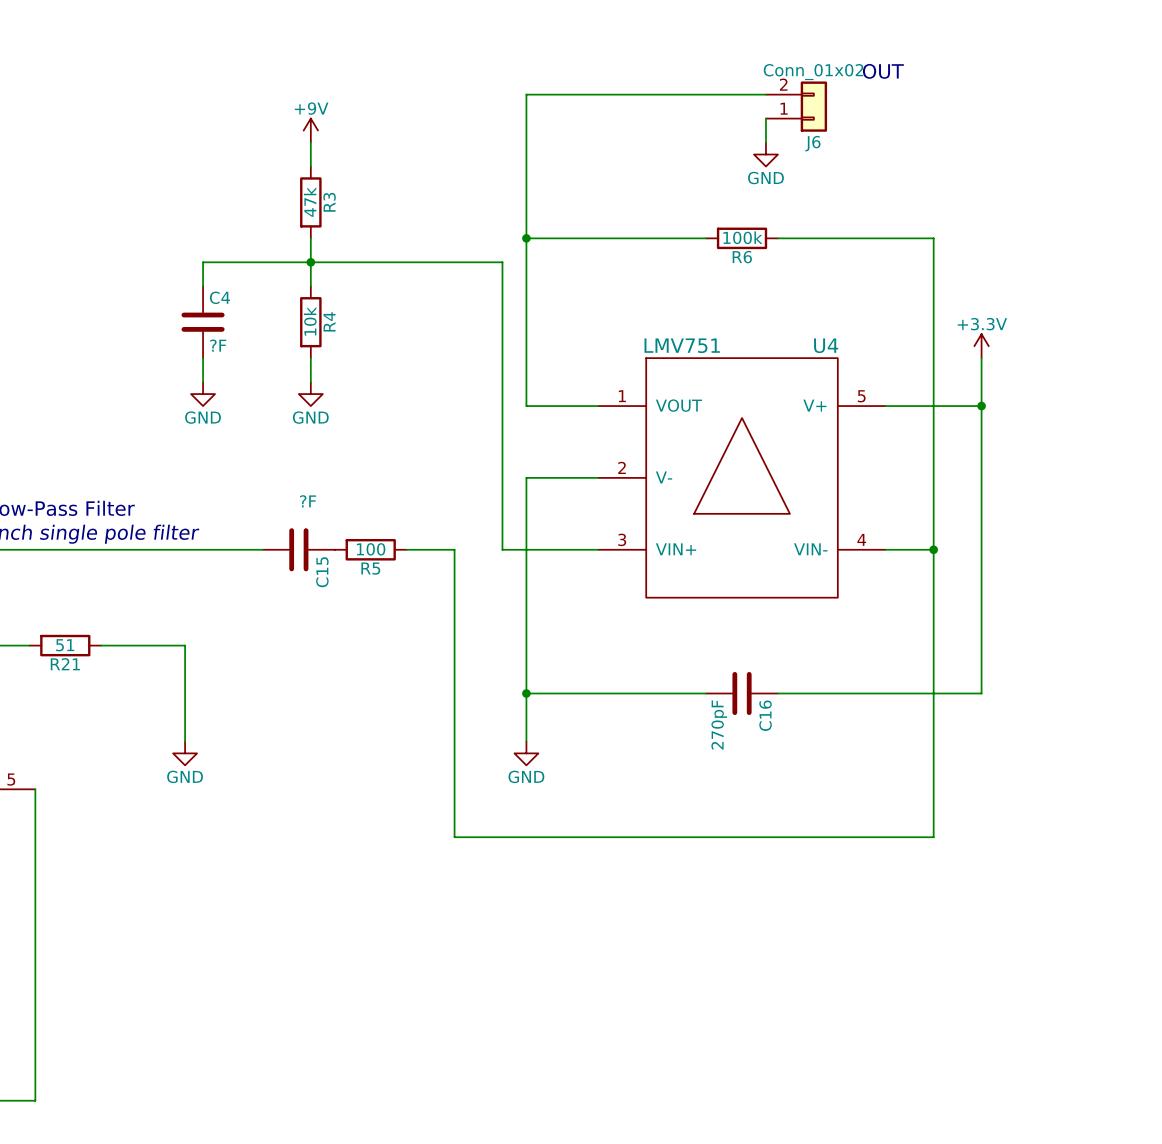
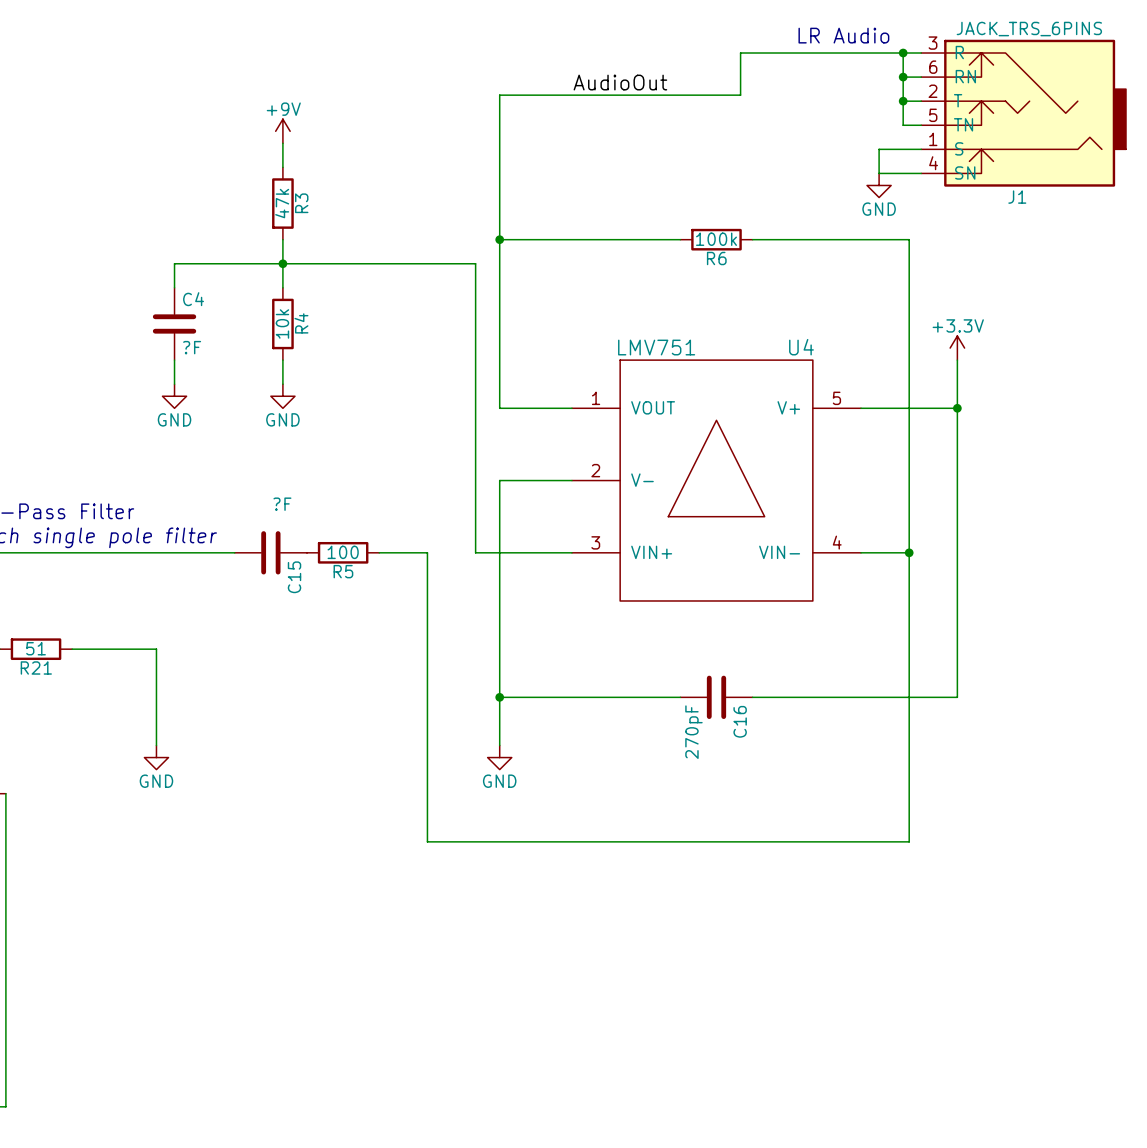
text: none -> LR Audio (843, 35)
wire: none -> (903, 53) (903, 125) (921, 125)
junction: none -> (903, 53)
wire: none -> (921, 53) (740, 53) (740, 95)
text: OUT (883, 71) -> none
wire: none -> (903, 77) (921, 77)
junction: none -> (903, 77)
label: none -> AudioOut (620, 82)
wire: none -> (903, 101) (921, 101)
junction: none -> (903, 101)
J6: Conn_01x02 (796, 106) -> none
J1: none -> JACK_TRS_6PINS (1023, 113)
wire: (765, 118) (765, 142) -> none
wire: none -> (921, 149) (879, 149) (879, 173) (921, 173)
power symbol position: GND (765, 154) -> GND (879, 185)

